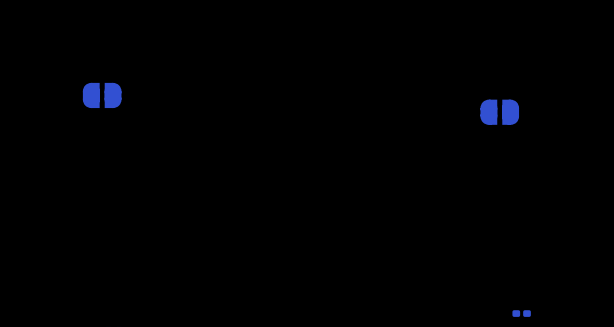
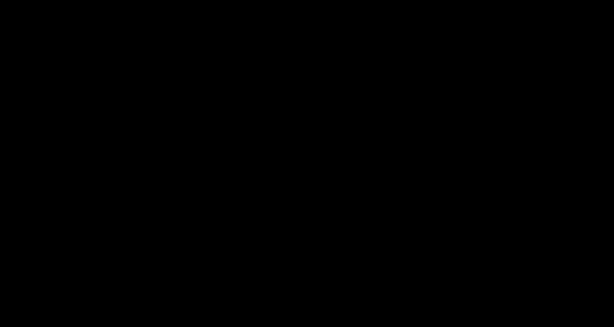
part: (102, 95) -> none
part: (499, 112) -> none
part: (521, 313) -> none

